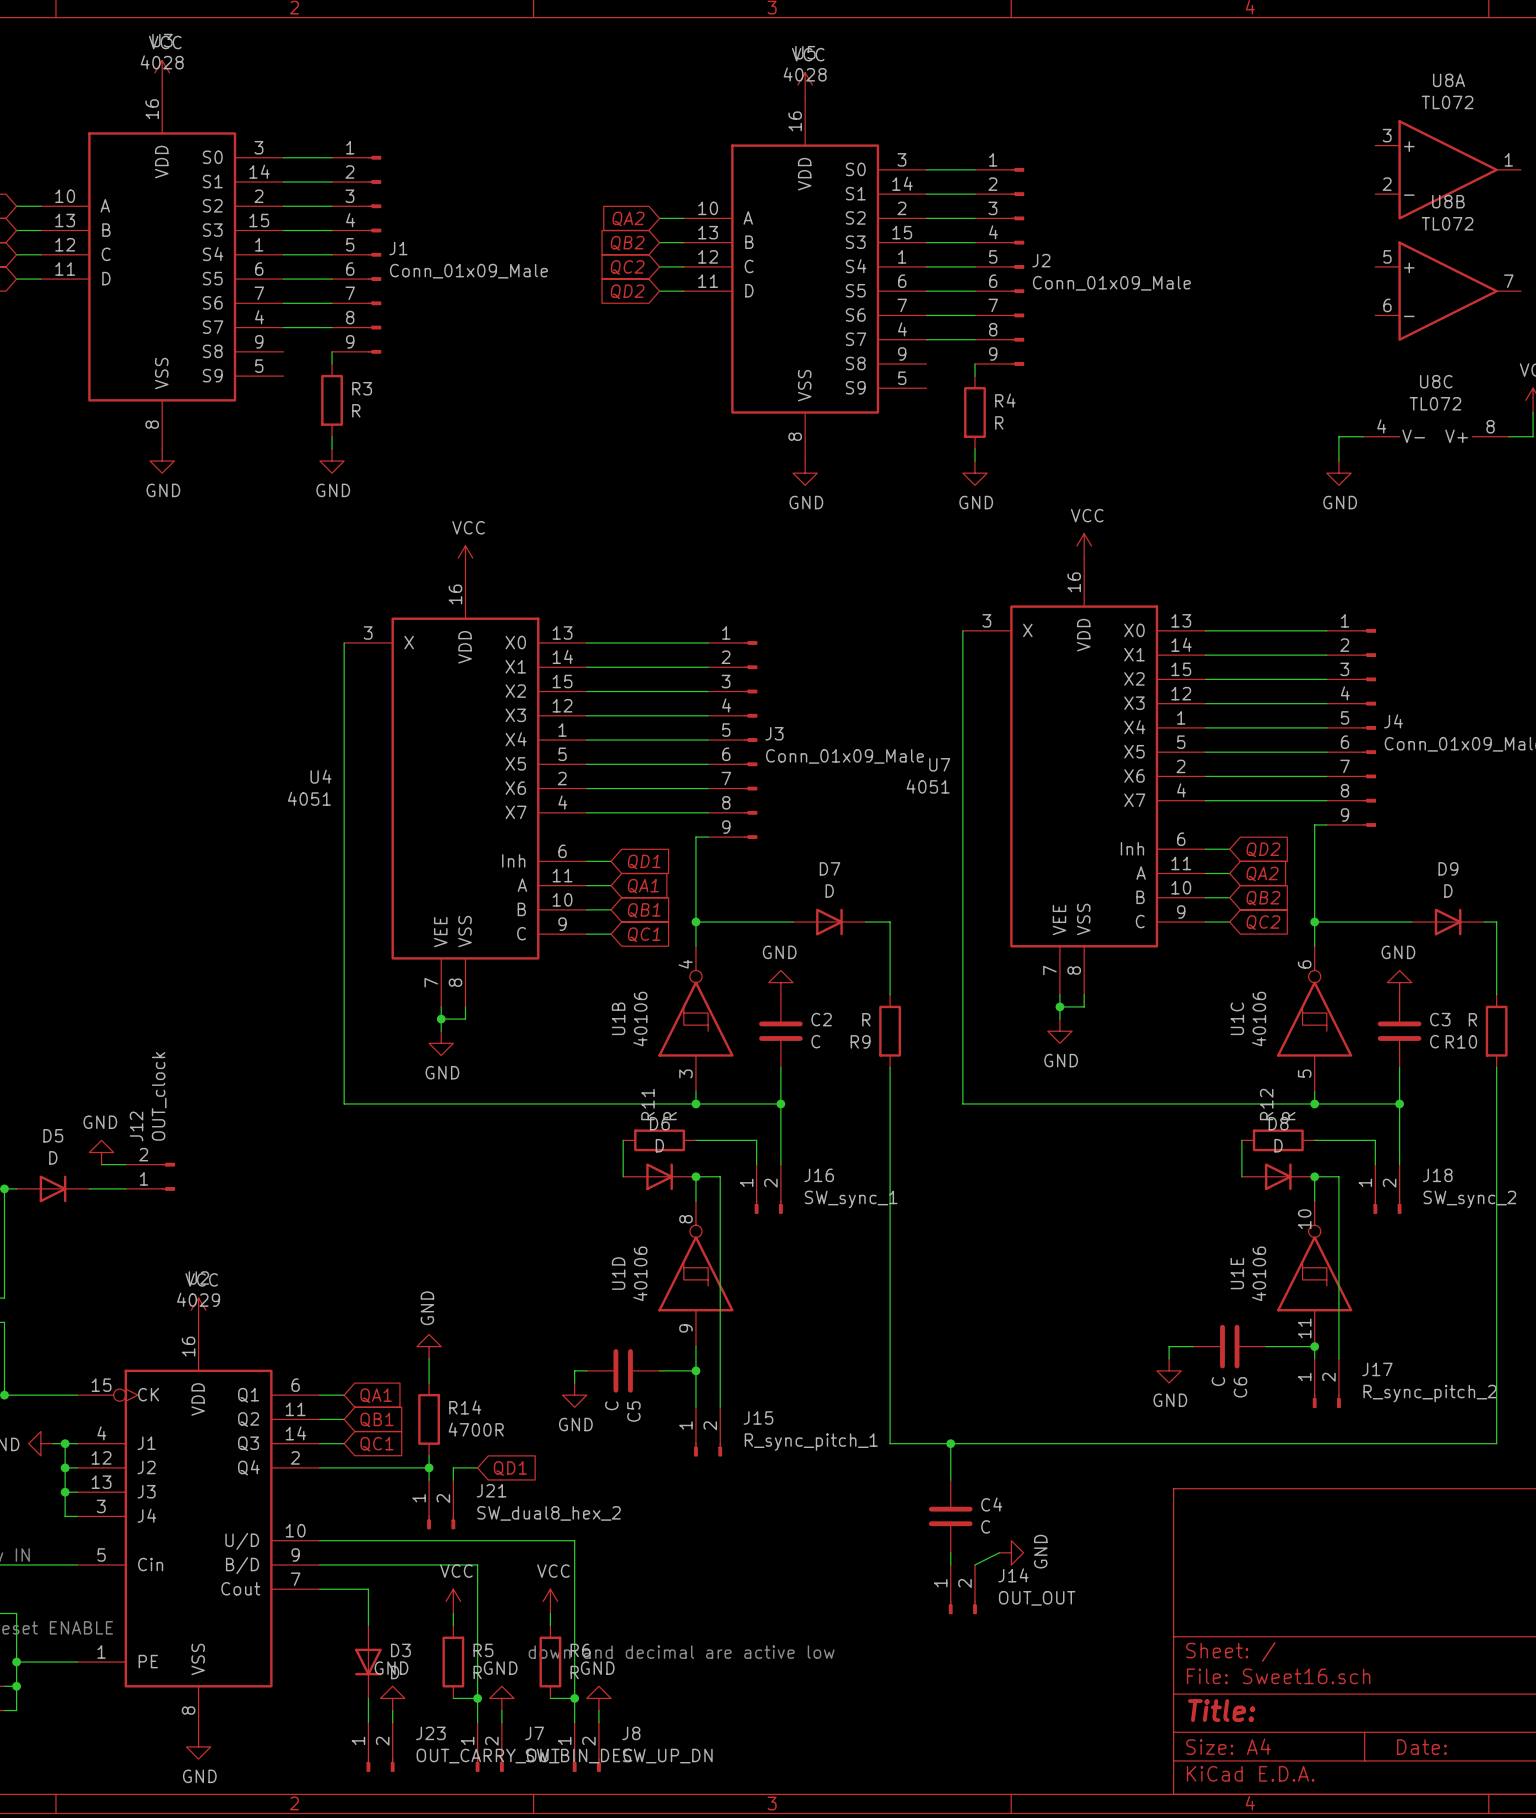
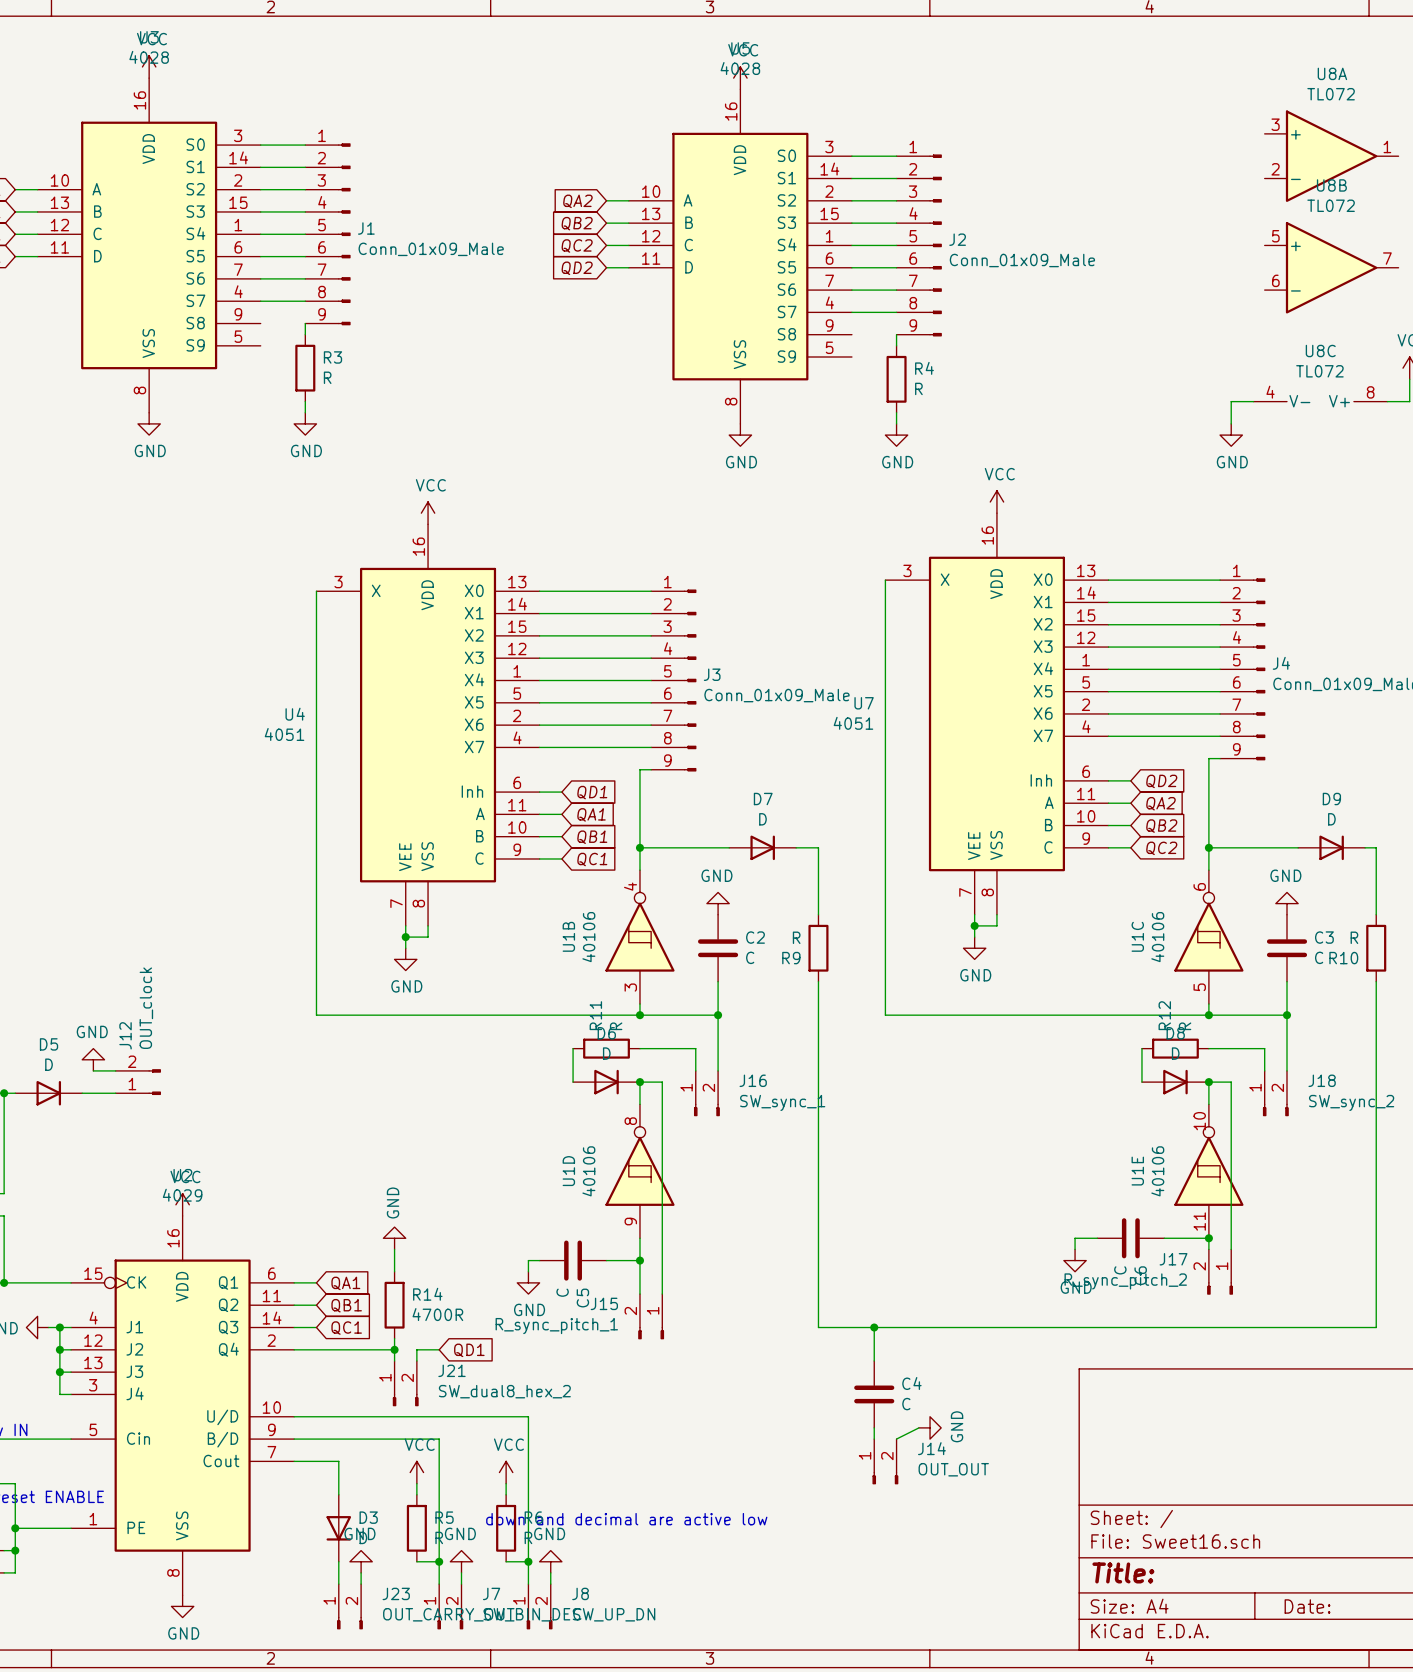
J17 flip: as is (1326, 1401) -> left-right (1220, 1288)
J15 flip: as is (708, 1449) -> left-right (651, 1333)

